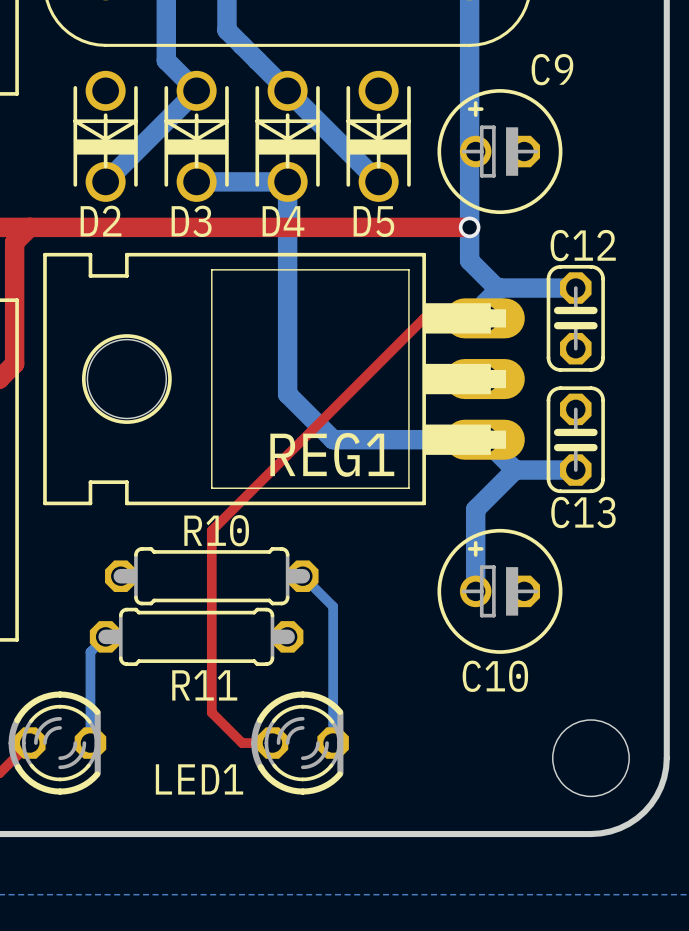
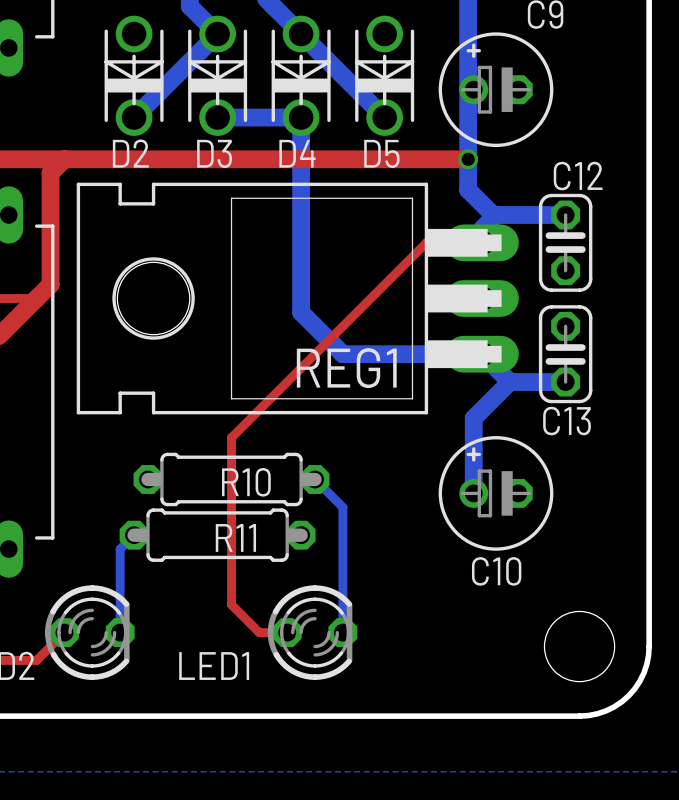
R10 name position: R10 (216, 530) -> R10 (246, 482)
R11 name position: R11 (204, 685) -> R11 (235, 537)

